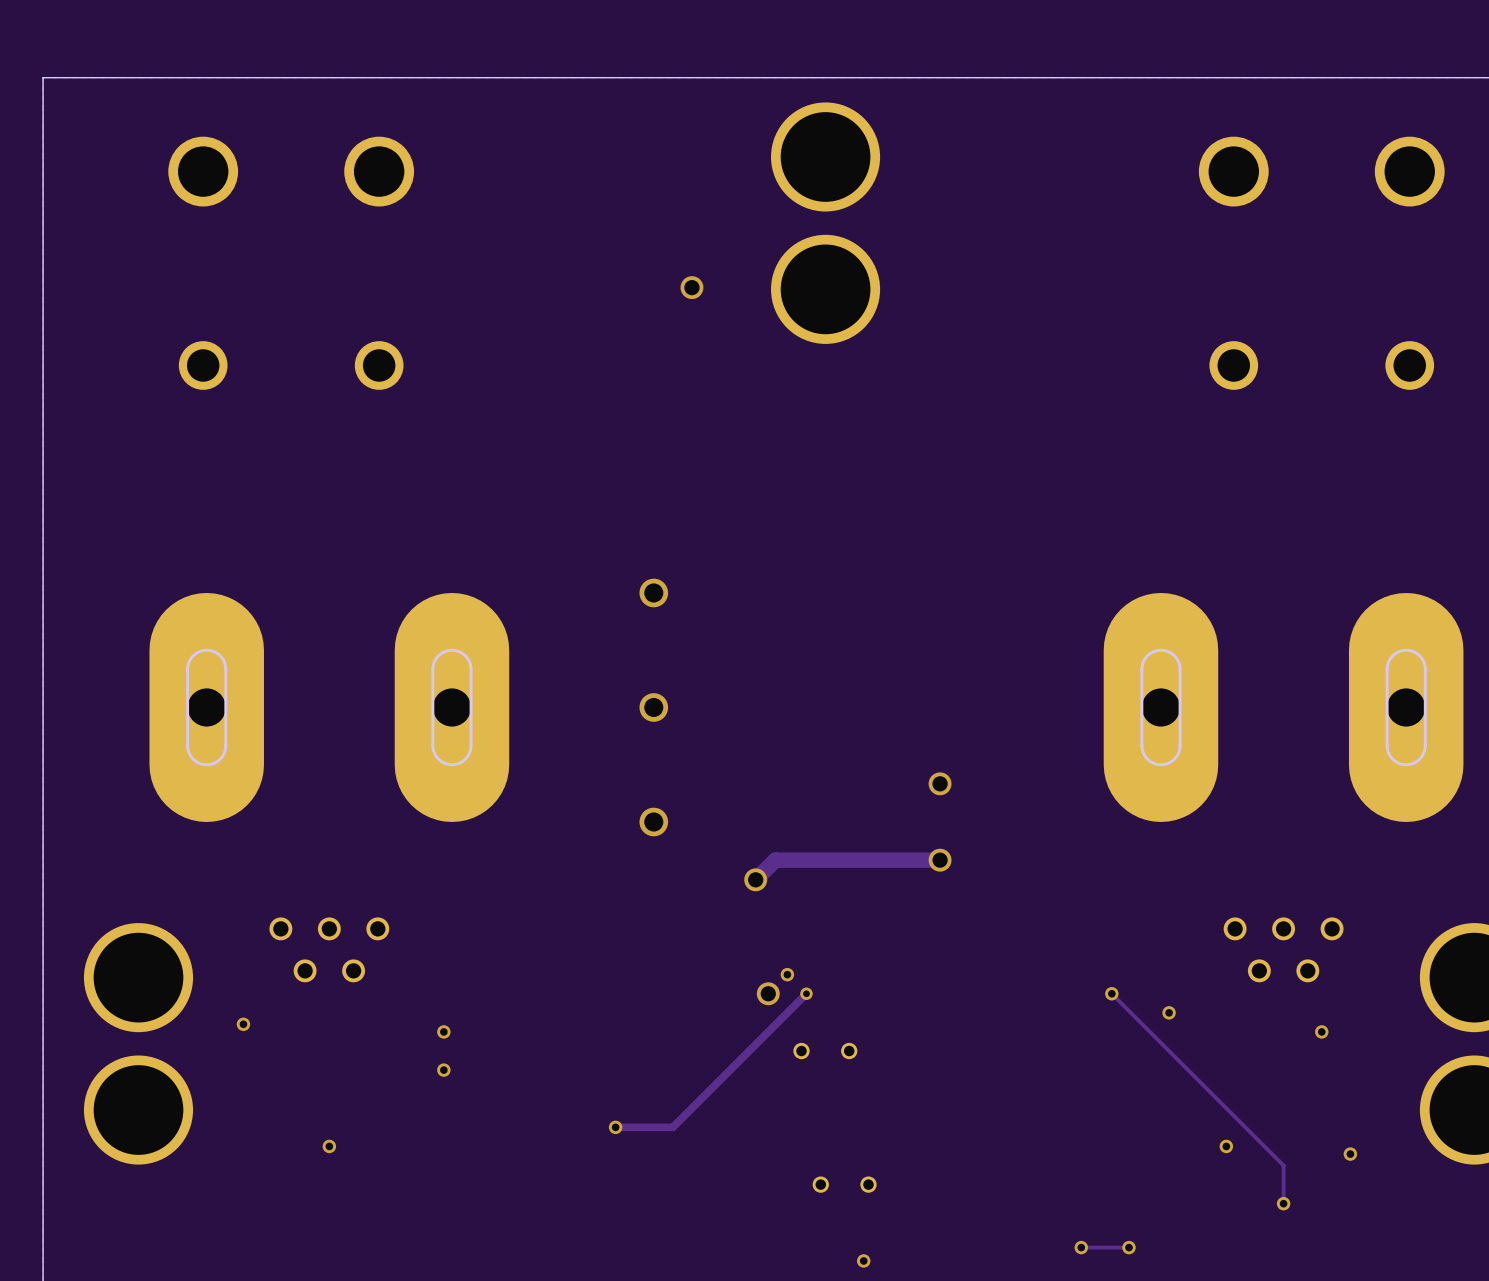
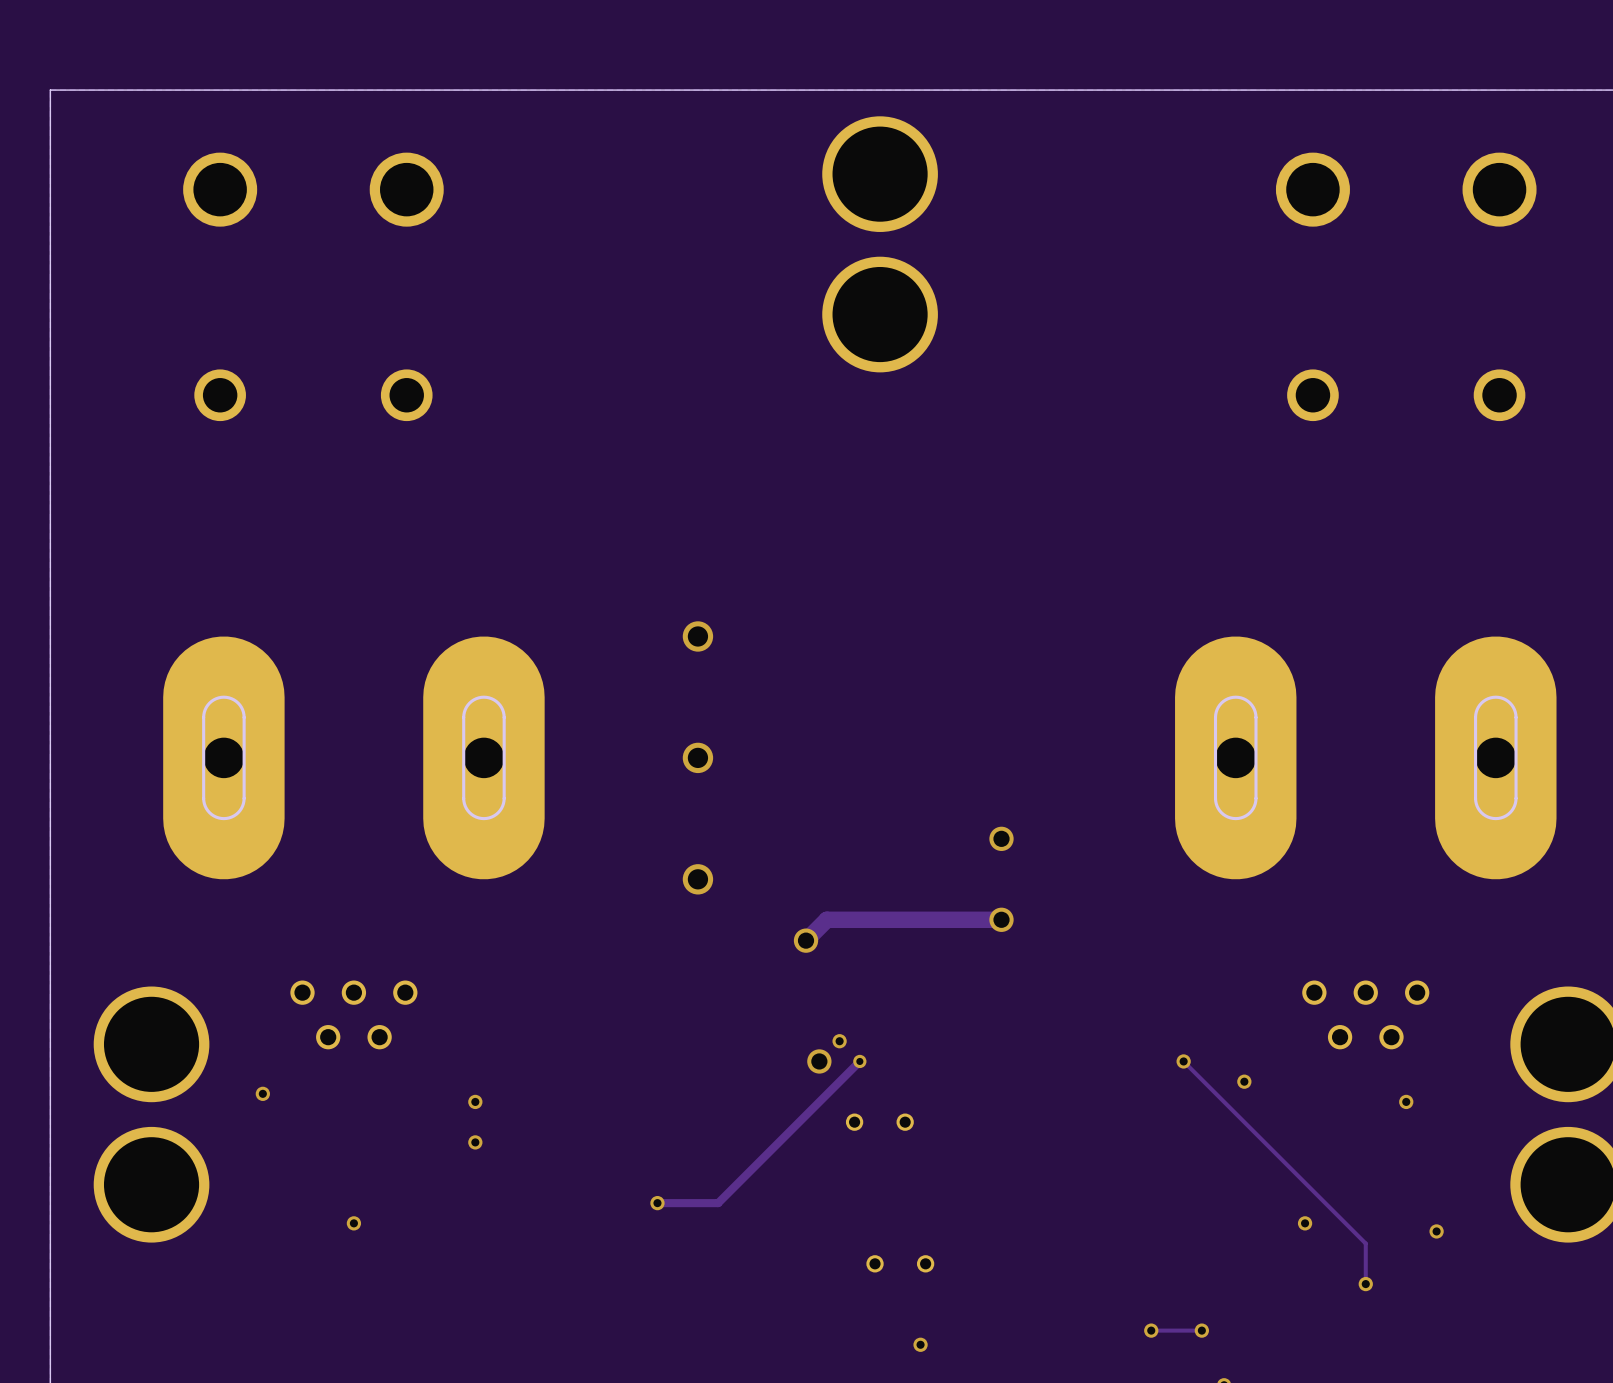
via: (691, 287) -> none

